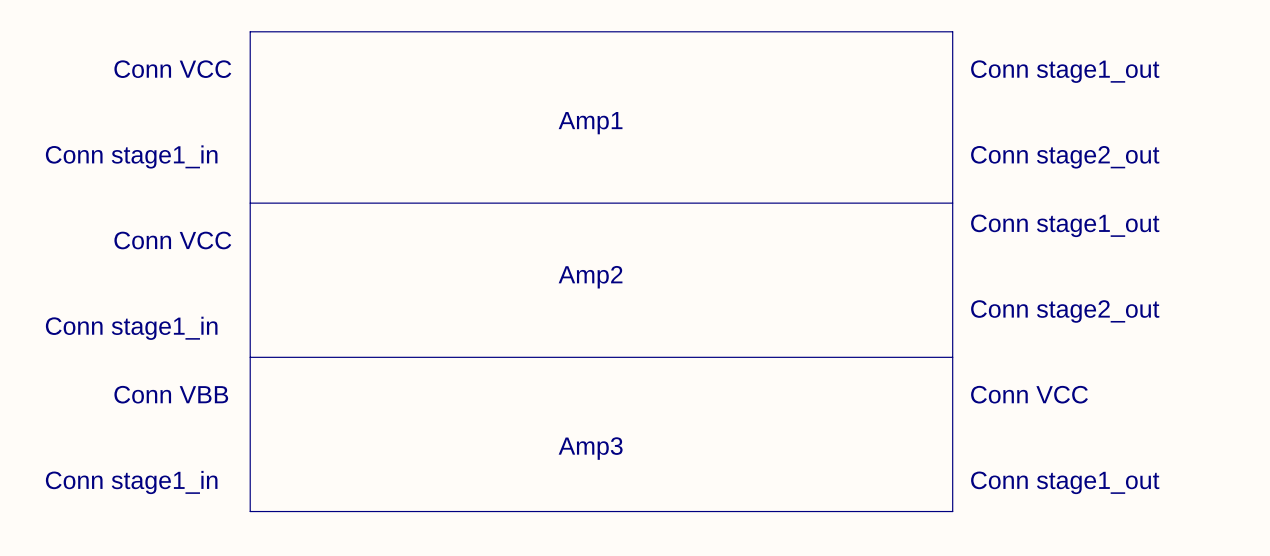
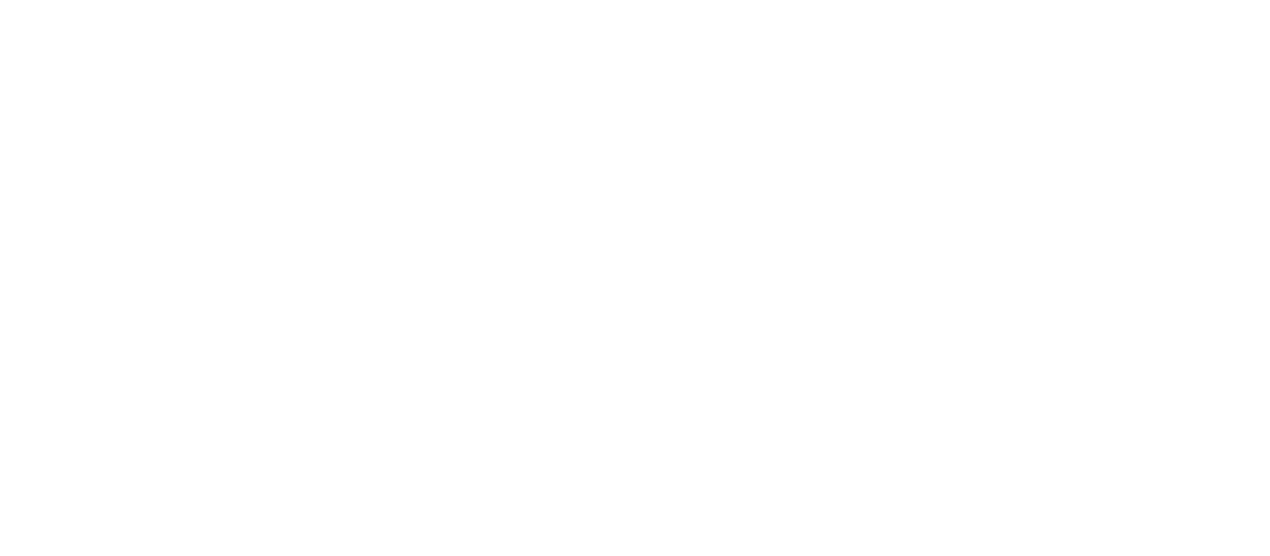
line: (250, 31) (250, 511) (952, 511) (952, 31) (250, 31) -> none
text: Conn VCC (172, 69) -> none
text: Conn stage1_out (1065, 71) -> none
text: Amp1 (590, 123) -> none
text: Conn stage1_in (131, 156) -> none
text: Conn stage2_out (1065, 157) -> none
line: (250, 203) (952, 203) -> none
text: Conn stage1_out (1065, 225) -> none
text: Conn VCC (172, 240) -> none
text: Amp2 (590, 277) -> none
text: Conn stage2_out (1065, 311) -> none
text: Conn stage1_in (131, 328) -> none
line: (250, 357) (952, 357) -> none
text: Conn VBB (171, 394) -> none
text: Conn VCC (1029, 394) -> none
text: Amp3 (590, 448) -> none
text: Conn stage1_in (131, 482) -> none
text: Conn stage1_out (1065, 482) -> none

